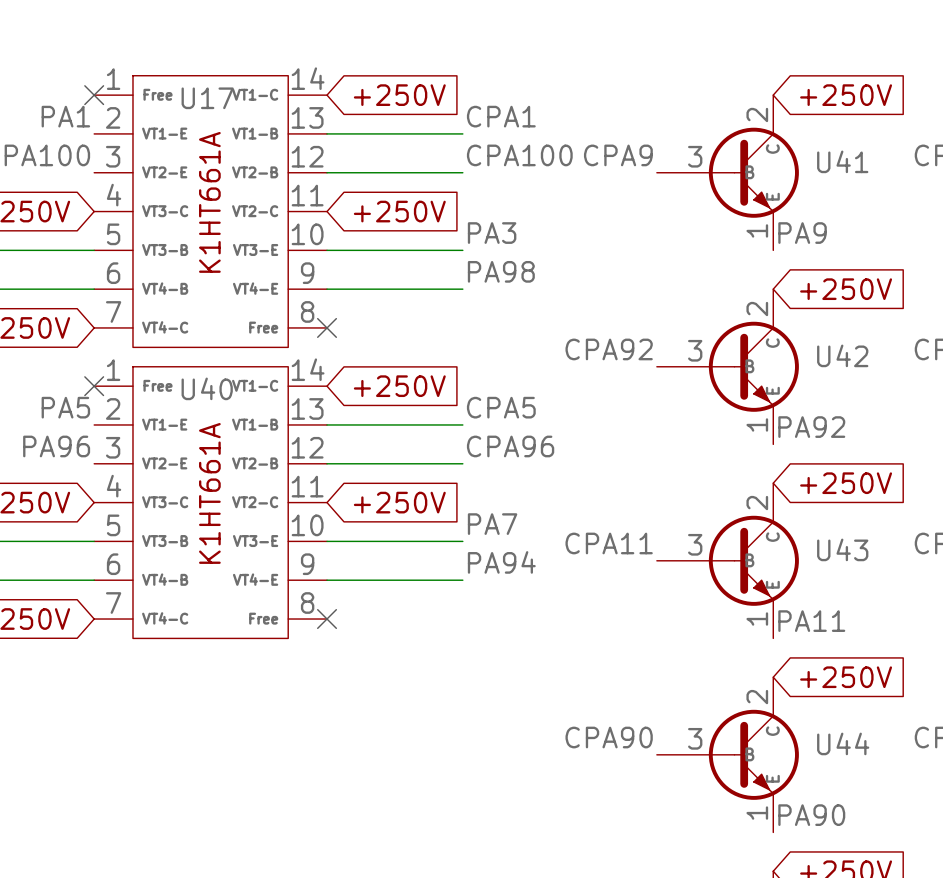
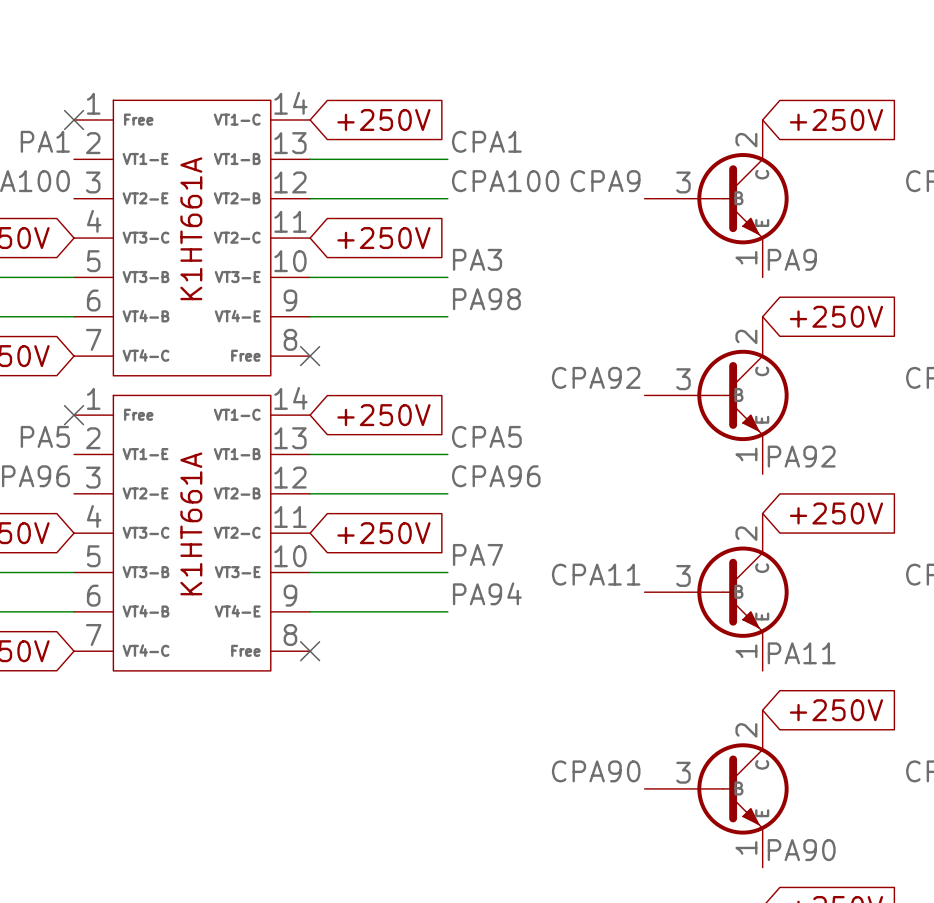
U17 name: U17 (207, 98) -> none
U41 name: U41 (842, 161) -> none
U42 name: U42 (842, 355) -> none
U40 name: U40 (207, 388) -> none
U43 name: U43 (842, 549) -> none
U44 name: U44 (843, 743) -> none

